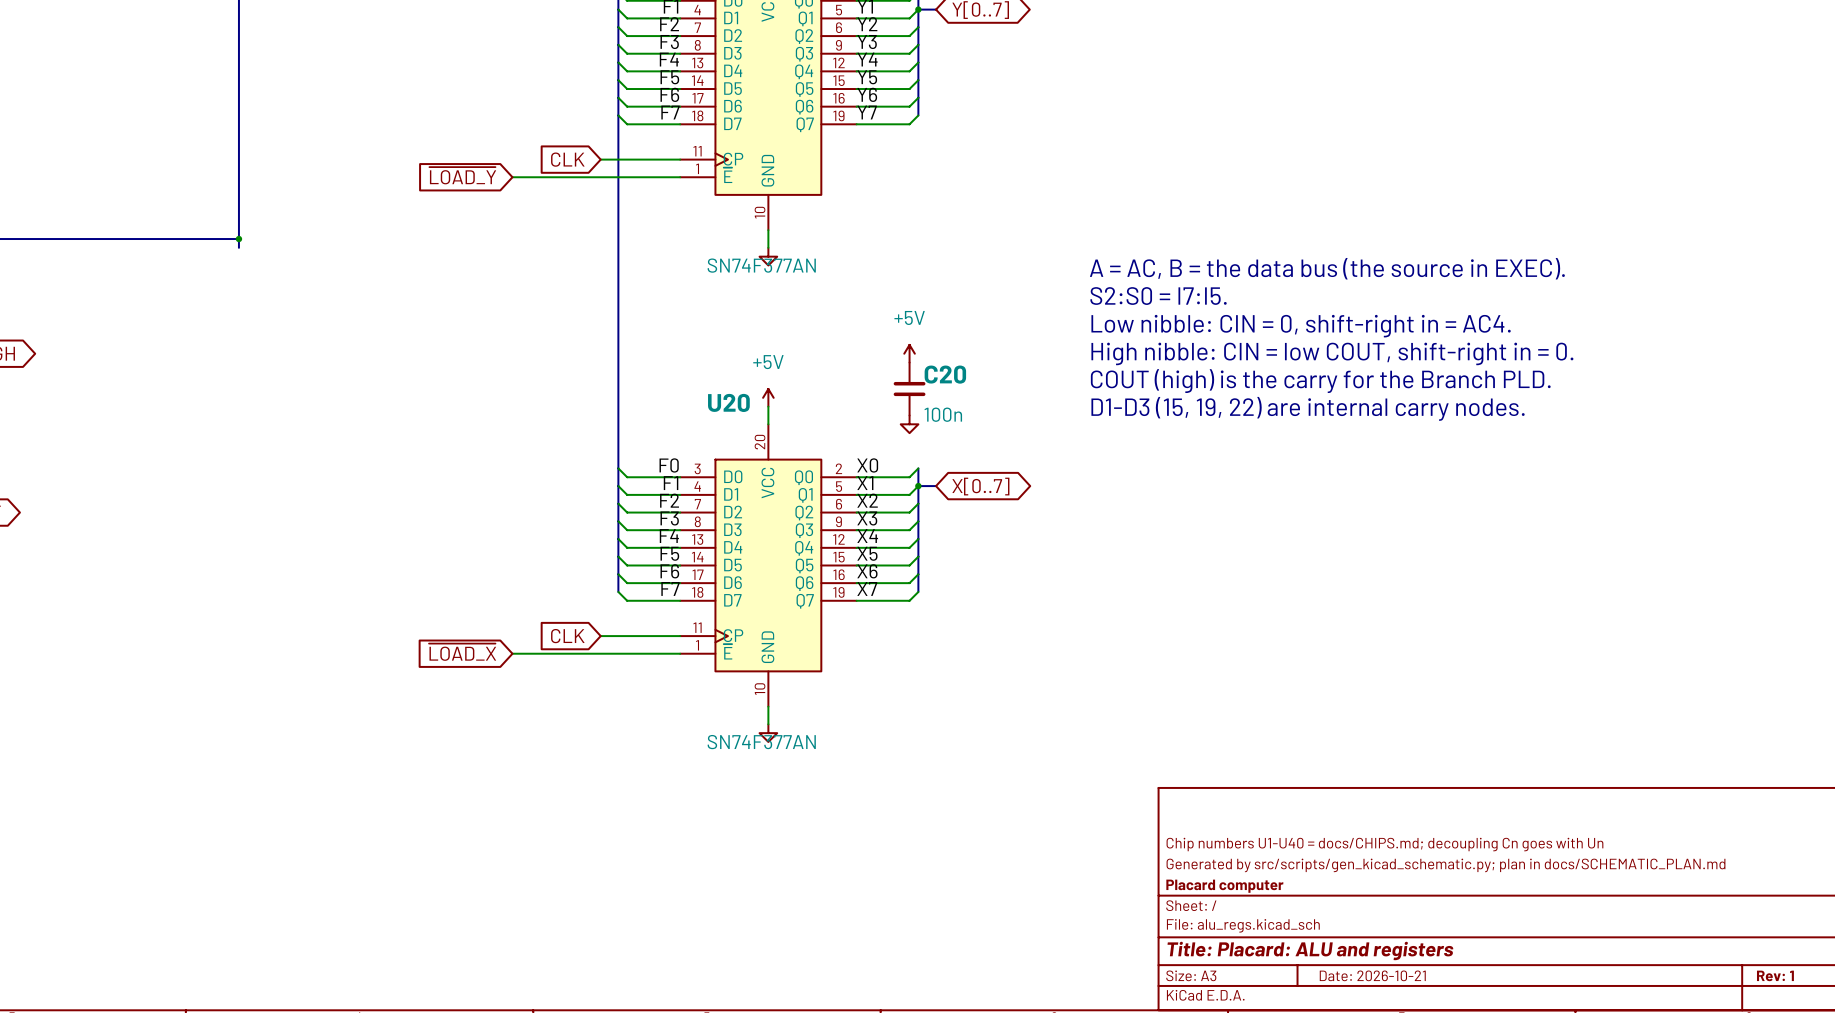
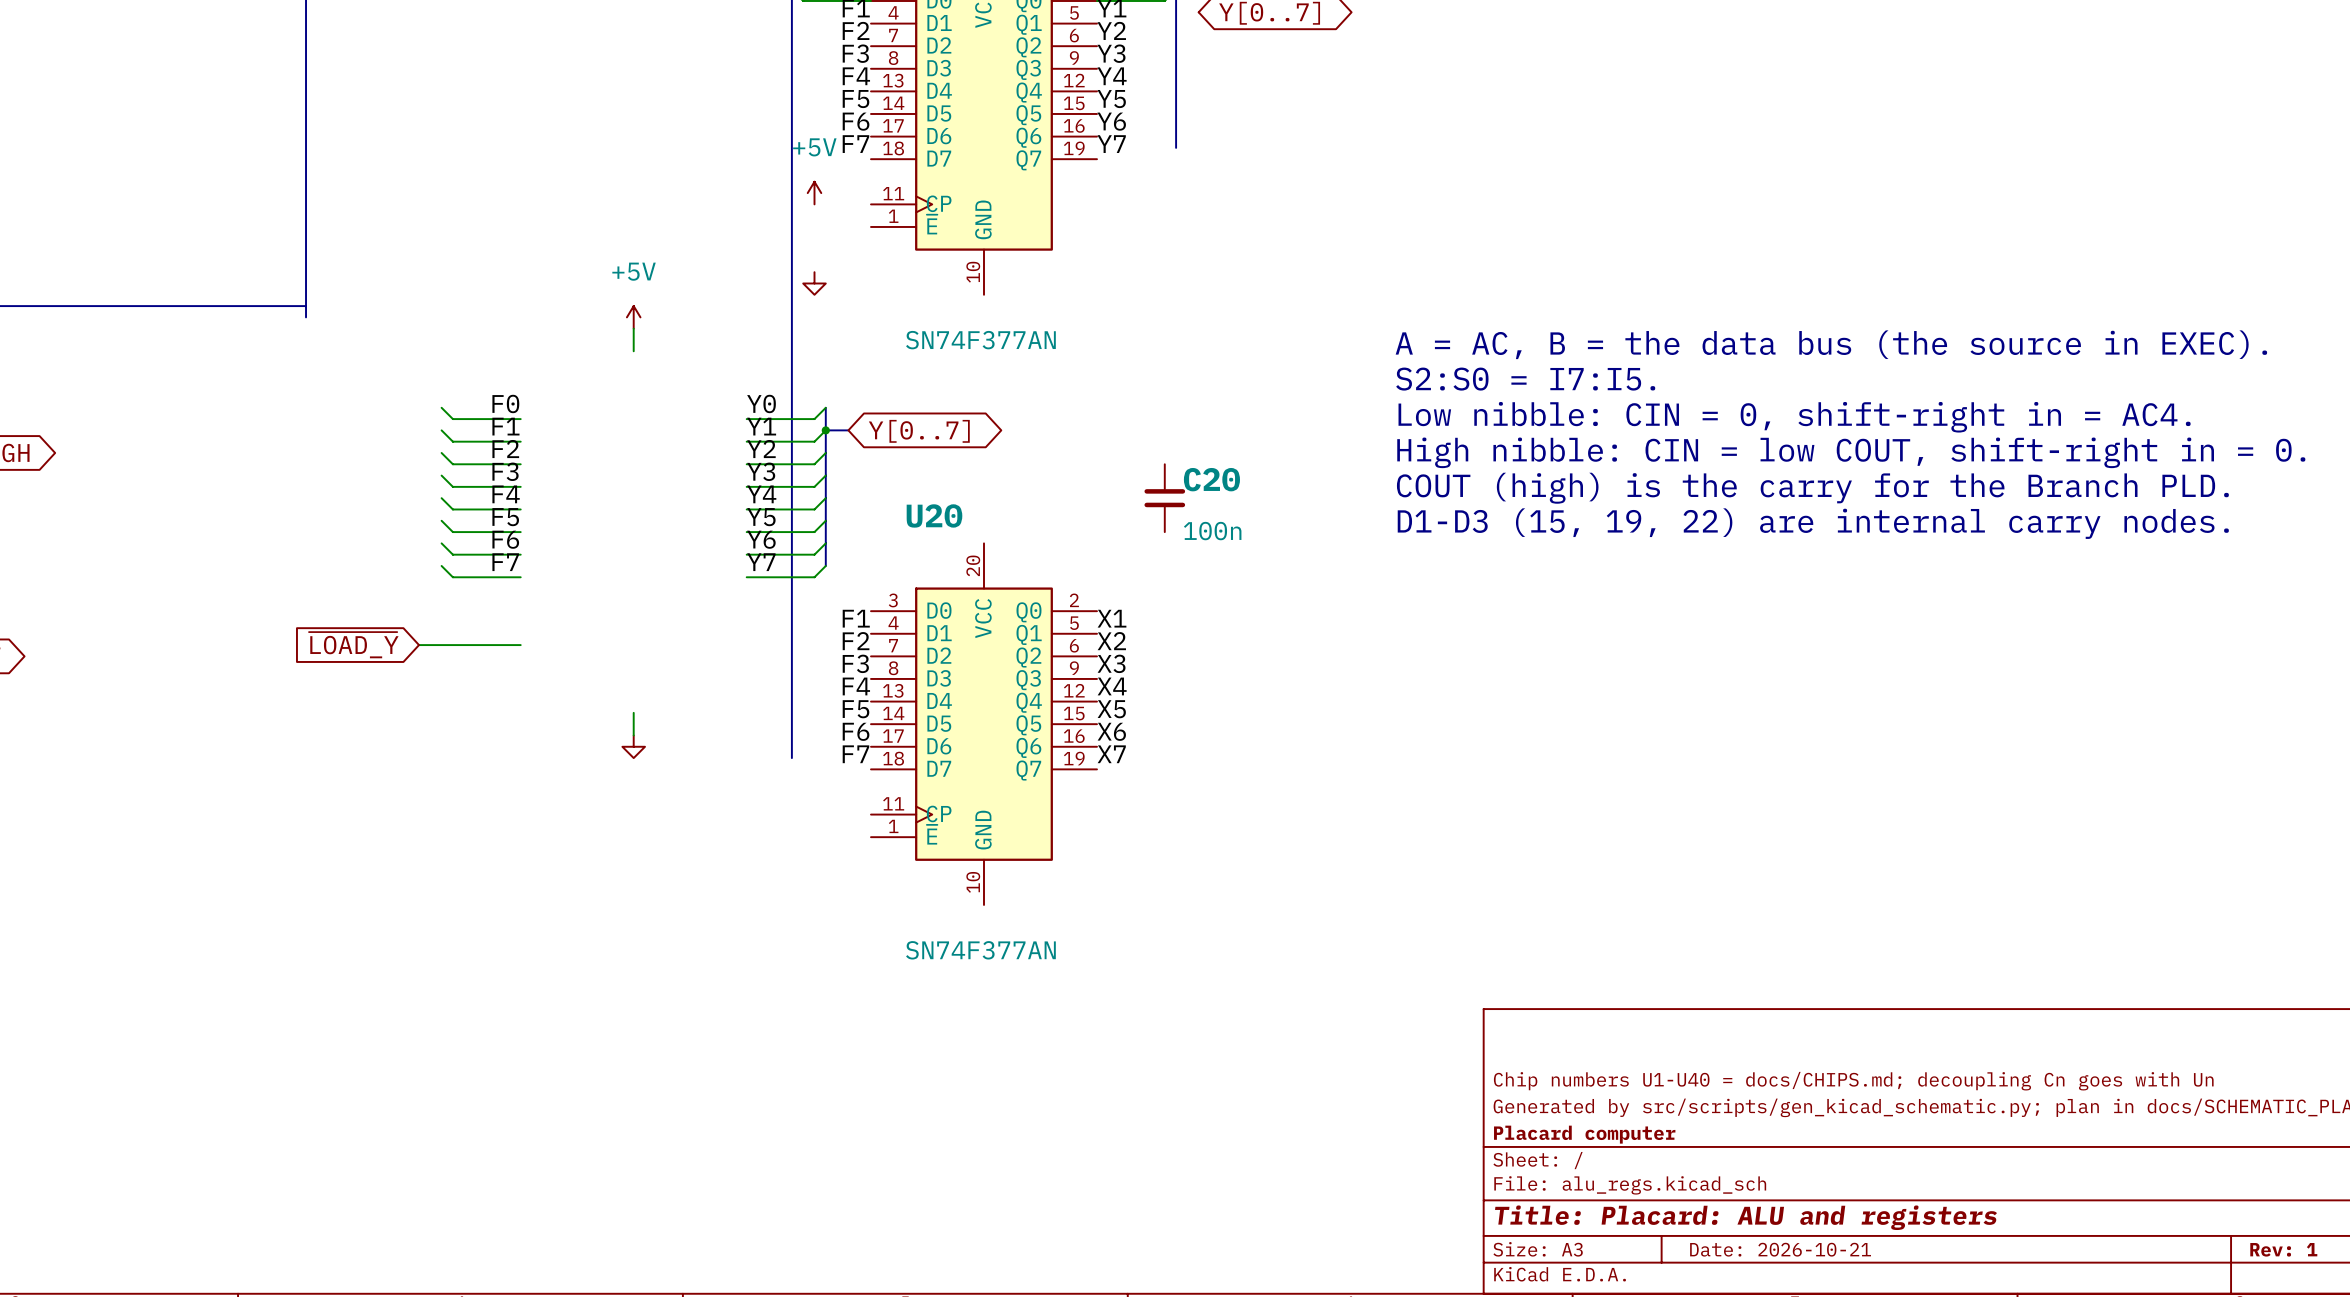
wire: (618, 9) (627, 18) (680, 18) -> none
wire: (918, 9) (909, 18) (856, 18) -> none
bus: (918, 9) (936, 9) -> none
junction: (918, 9) -> none
wire: (618, 27) (627, 36) (680, 36) -> none
wire: (918, 27) (909, 36) (856, 36) -> none
wire: (618, 44) (627, 53) (680, 53) -> none
wire: (918, 44) (909, 53) (856, 53) -> none
wire: (618, 62) (627, 71) (680, 71) -> none
wire: (918, 62) (909, 71) (856, 71) -> none
wire: (618, 80) (627, 89) (680, 89) -> none
wire: (918, 80) (909, 89) (856, 89) -> none
wire: (618, 97) (627, 106) (680, 106) -> none
wire: (918, 97) (909, 106) (856, 106) -> none
wire: (618, 115) (627, 124) (680, 124) -> none
wire: (918, 115) (909, 124) (856, 124) -> none
power symbol: none -> +5V (814, 193)
global label: CLK (567, 159) -> none
wire: (600, 159) (680, 159) -> none
global label: ~{LOAD_Y} (462, 175) -> none
wire: (512, 177) (680, 177) -> none
wire: (768, 230) (768, 247) -> none
junction: (238, 239) -> none
power symbol: none -> +5V (633, 317)
wire: none -> (633, 328) (633, 351)
power symbol position: (768, 256) -> (814, 283)
label: none -> F0 (505, 403)
label: none -> Y0 (761, 403)
wire: none -> (441, 407) (452, 419) (520, 419)
wire: none -> (825, 407) (814, 419) (746, 419)
bus: none -> (825, 407) (825, 565)
label: none -> F1 (505, 426)
label: none -> Y1 (761, 426)
wire: none -> (441, 430) (452, 441) (520, 441)
wire: none -> (825, 430) (814, 441) (746, 441)
bus: none -> (825, 430) (848, 430)
junction: none -> (825, 430)
global label: none -> Y[0..7] (919, 431)
label: none -> F2 (505, 449)
label: none -> Y2 (761, 449)
wire: none -> (441, 452) (452, 464) (520, 464)
wire: none -> (825, 452) (814, 464) (746, 464)
power symbol: +5V (909, 353) -> none
label: none -> F3 (505, 471)
label: none -> Y3 (761, 471)
wire: none -> (441, 475) (452, 486) (520, 486)
wire: none -> (825, 475) (814, 486) (746, 486)
label: none -> F4 (506, 494)
label: none -> Y4 (761, 494)
wire: none -> (441, 498) (452, 509) (520, 509)
wire: none -> (825, 498) (814, 509) (746, 509)
power symbol: +5V (768, 397) -> none
label: none -> F5 (505, 517)
label: none -> Y5 (761, 517)
wire: none -> (441, 520) (452, 532) (520, 532)
wire: none -> (825, 520) (814, 532) (746, 532)
wire: (768, 406) (768, 424) -> none
label: none -> F6 (505, 539)
label: none -> Y6 (761, 539)
wire: none -> (441, 543) (452, 554) (520, 554)
wire: none -> (825, 543) (814, 554) (746, 554)
power symbol: (909, 424) -> none
label: none -> F7 (505, 562)
label: none -> Y7 (761, 562)
wire: none -> (441, 565) (452, 577) (520, 577)
wire: none -> (825, 565) (814, 577) (746, 577)
label: F0 (669, 465) -> none
label: X0 (867, 465) -> none
wire: (618, 468) (627, 477) (680, 477) -> none
wire: (918, 468) (909, 477) (856, 477) -> none
bus: (918, 468) (918, 591) -> none
wire: (618, 486) (627, 494) (680, 494) -> none
wire: (918, 486) (909, 494) (856, 494) -> none
bus: (918, 486) (936, 486) -> none
junction: (918, 486) -> none
global label: X[0..7] (980, 486) -> none
global label: none -> ~{LOAD_Y} (353, 645)
wire: none -> (419, 645) (520, 645)
wire: (618, 503) (627, 512) (680, 512) -> none
wire: (918, 503) (909, 512) (856, 512) -> none
wire: (618, 521) (627, 530) (680, 530) -> none
wire: (918, 521) (909, 530) (856, 530) -> none
wire: (618, 539) (627, 547) (680, 547) -> none
wire: (918, 539) (909, 547) (856, 547) -> none
wire: none -> (633, 712) (633, 735)
wire: (618, 556) (627, 565) (680, 565) -> none
wire: (918, 556) (909, 565) (856, 565) -> none
wire: (618, 574) (627, 583) (680, 583) -> none
wire: (918, 574) (909, 583) (856, 583) -> none
power symbol: none -> (633, 746)
wire: (618, 591) (627, 600) (680, 600) -> none
wire: (918, 591) (909, 600) (856, 600) -> none
global label: CLK (567, 636) -> none
wire: (600, 636) (680, 636) -> none
global label: ~{LOAD_X} (462, 652) -> none
wire: (512, 653) (680, 653) -> none
wire: (768, 706) (768, 724) -> none
power symbol: (768, 733) -> none

